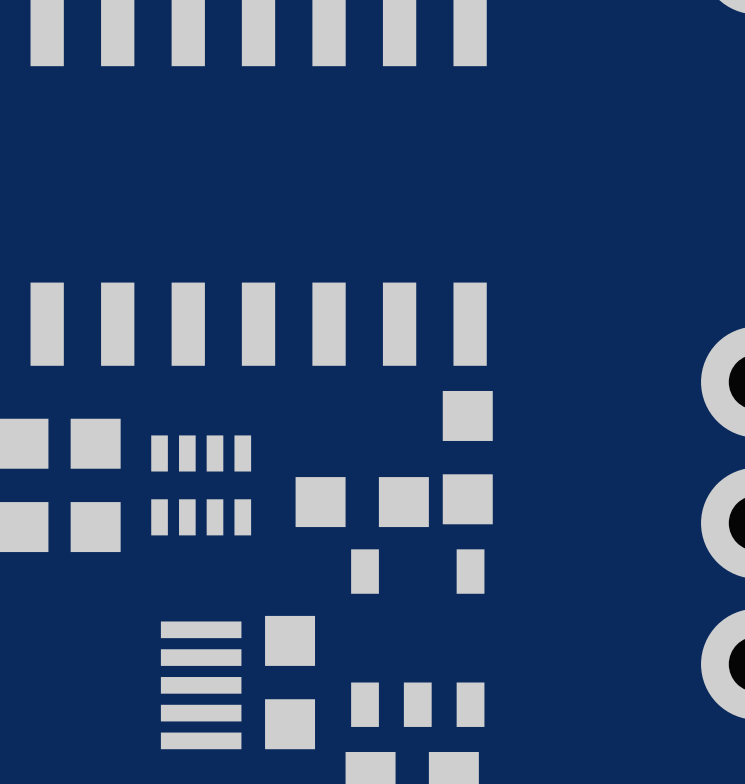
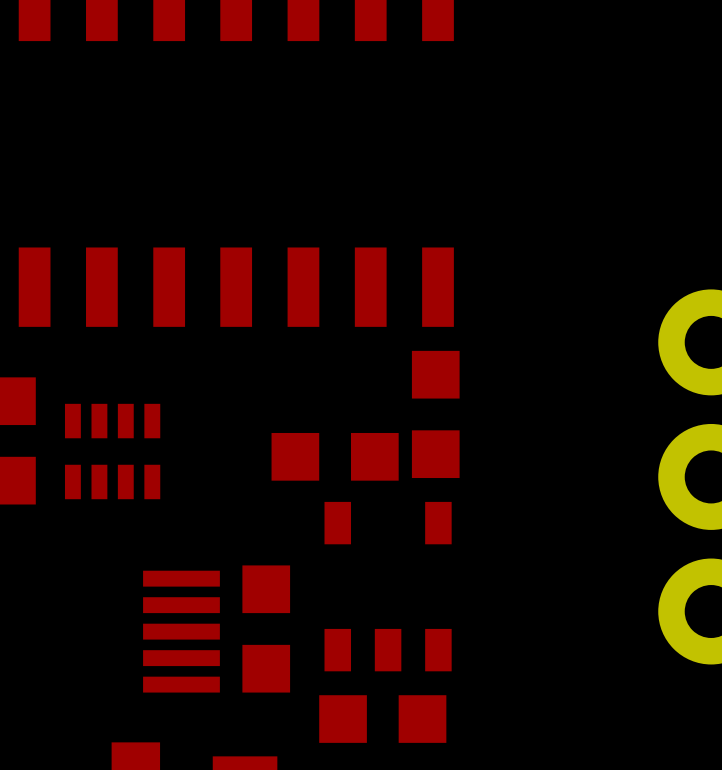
part footprint: [70, 418, 121, 553] -> [64, 403, 161, 500]
part: (201, 485) -> none

